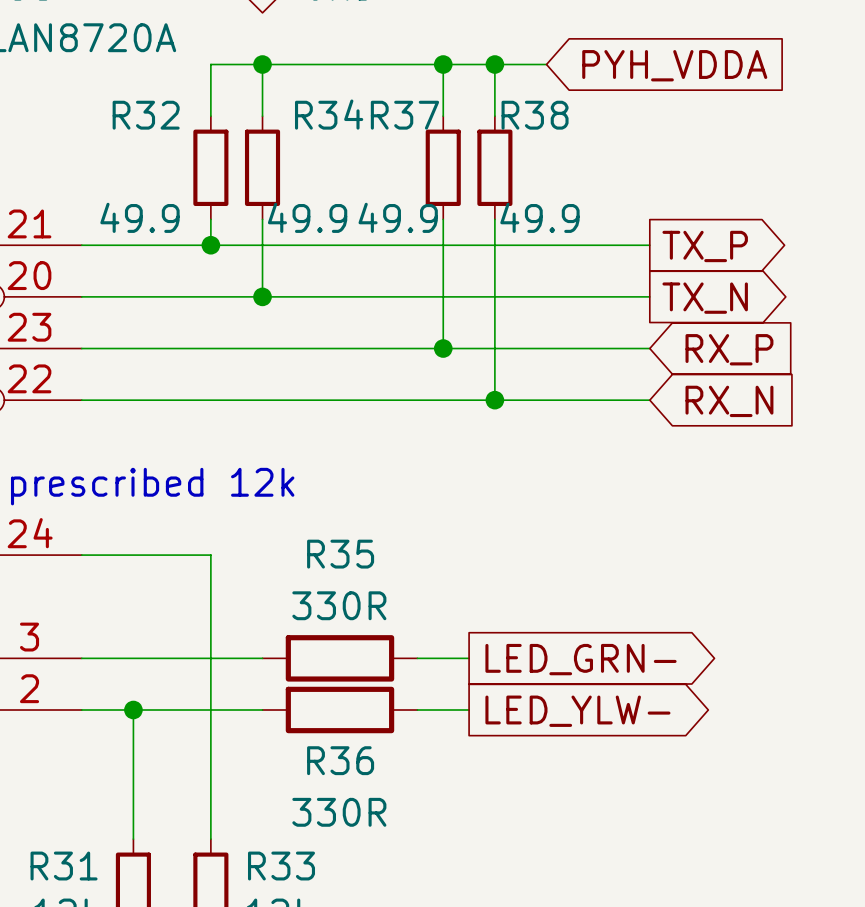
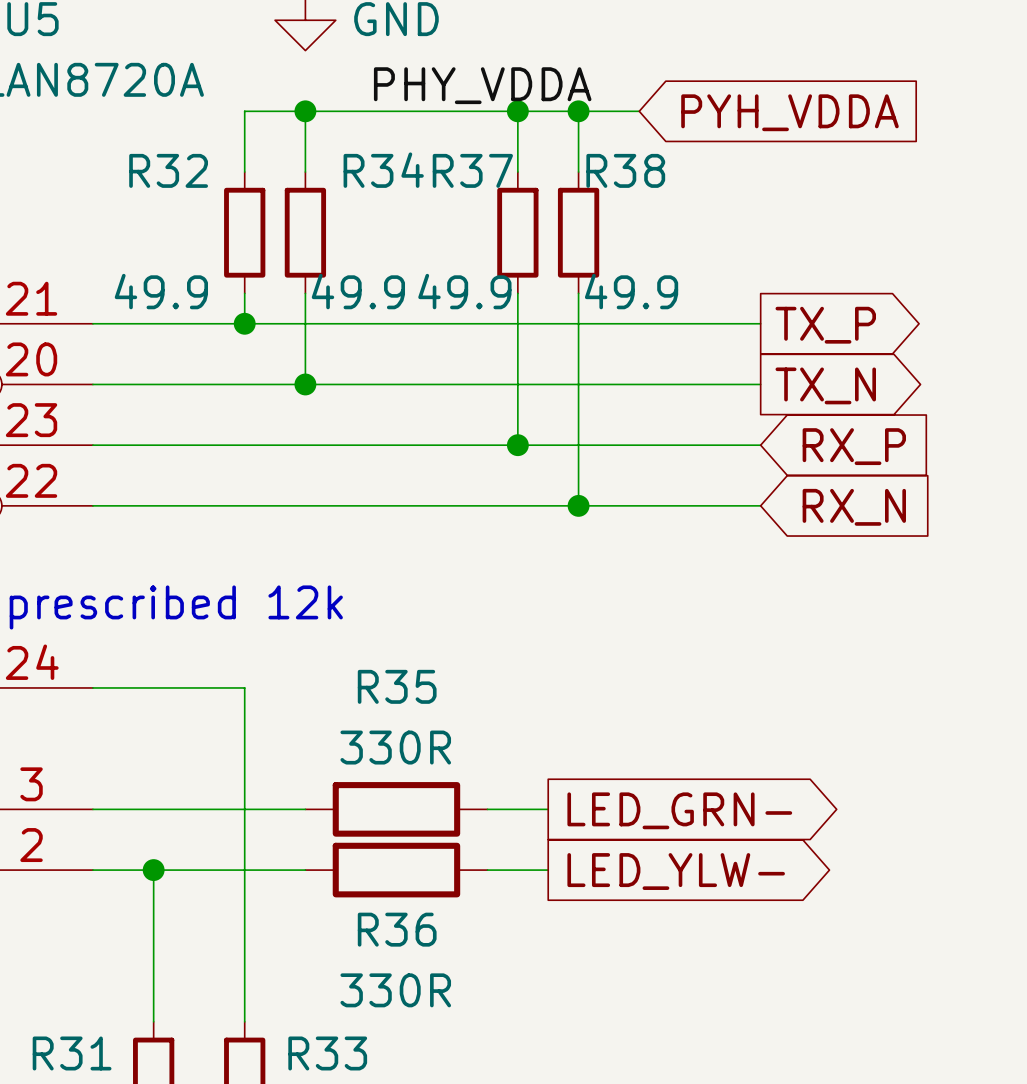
label: none -> PHY_VDDA (482, 85)

